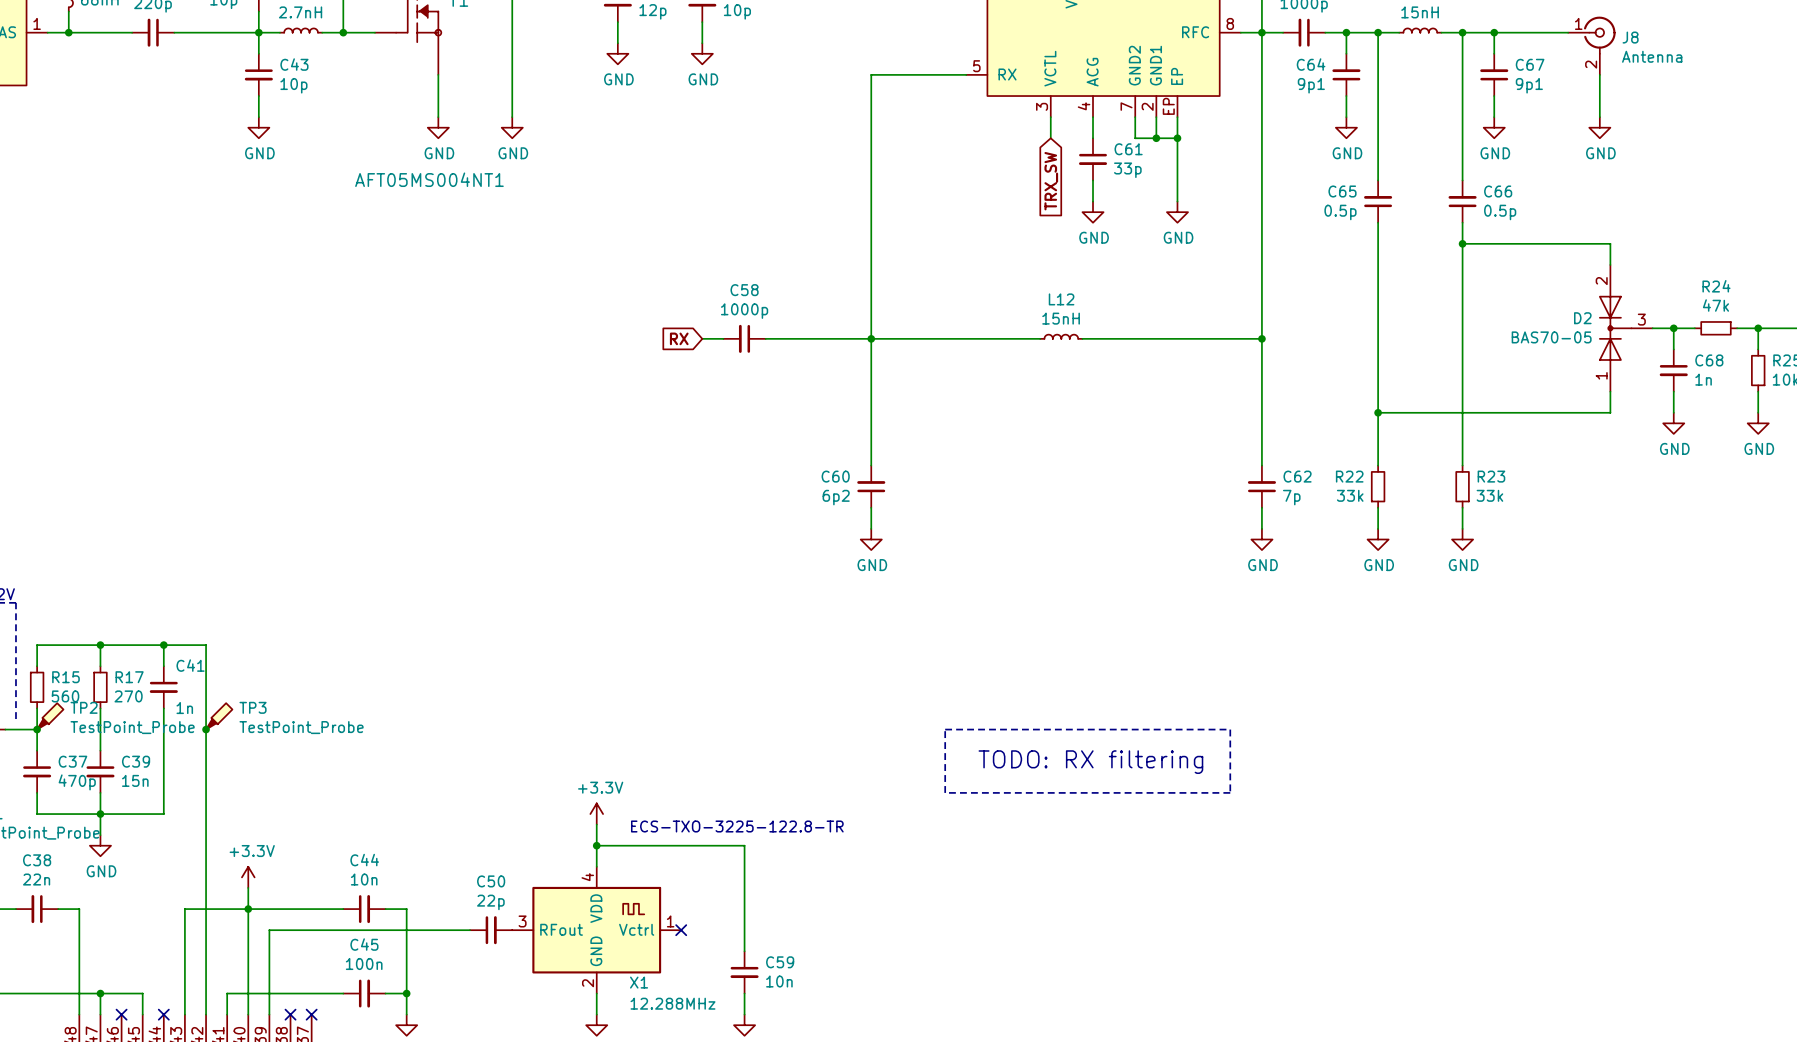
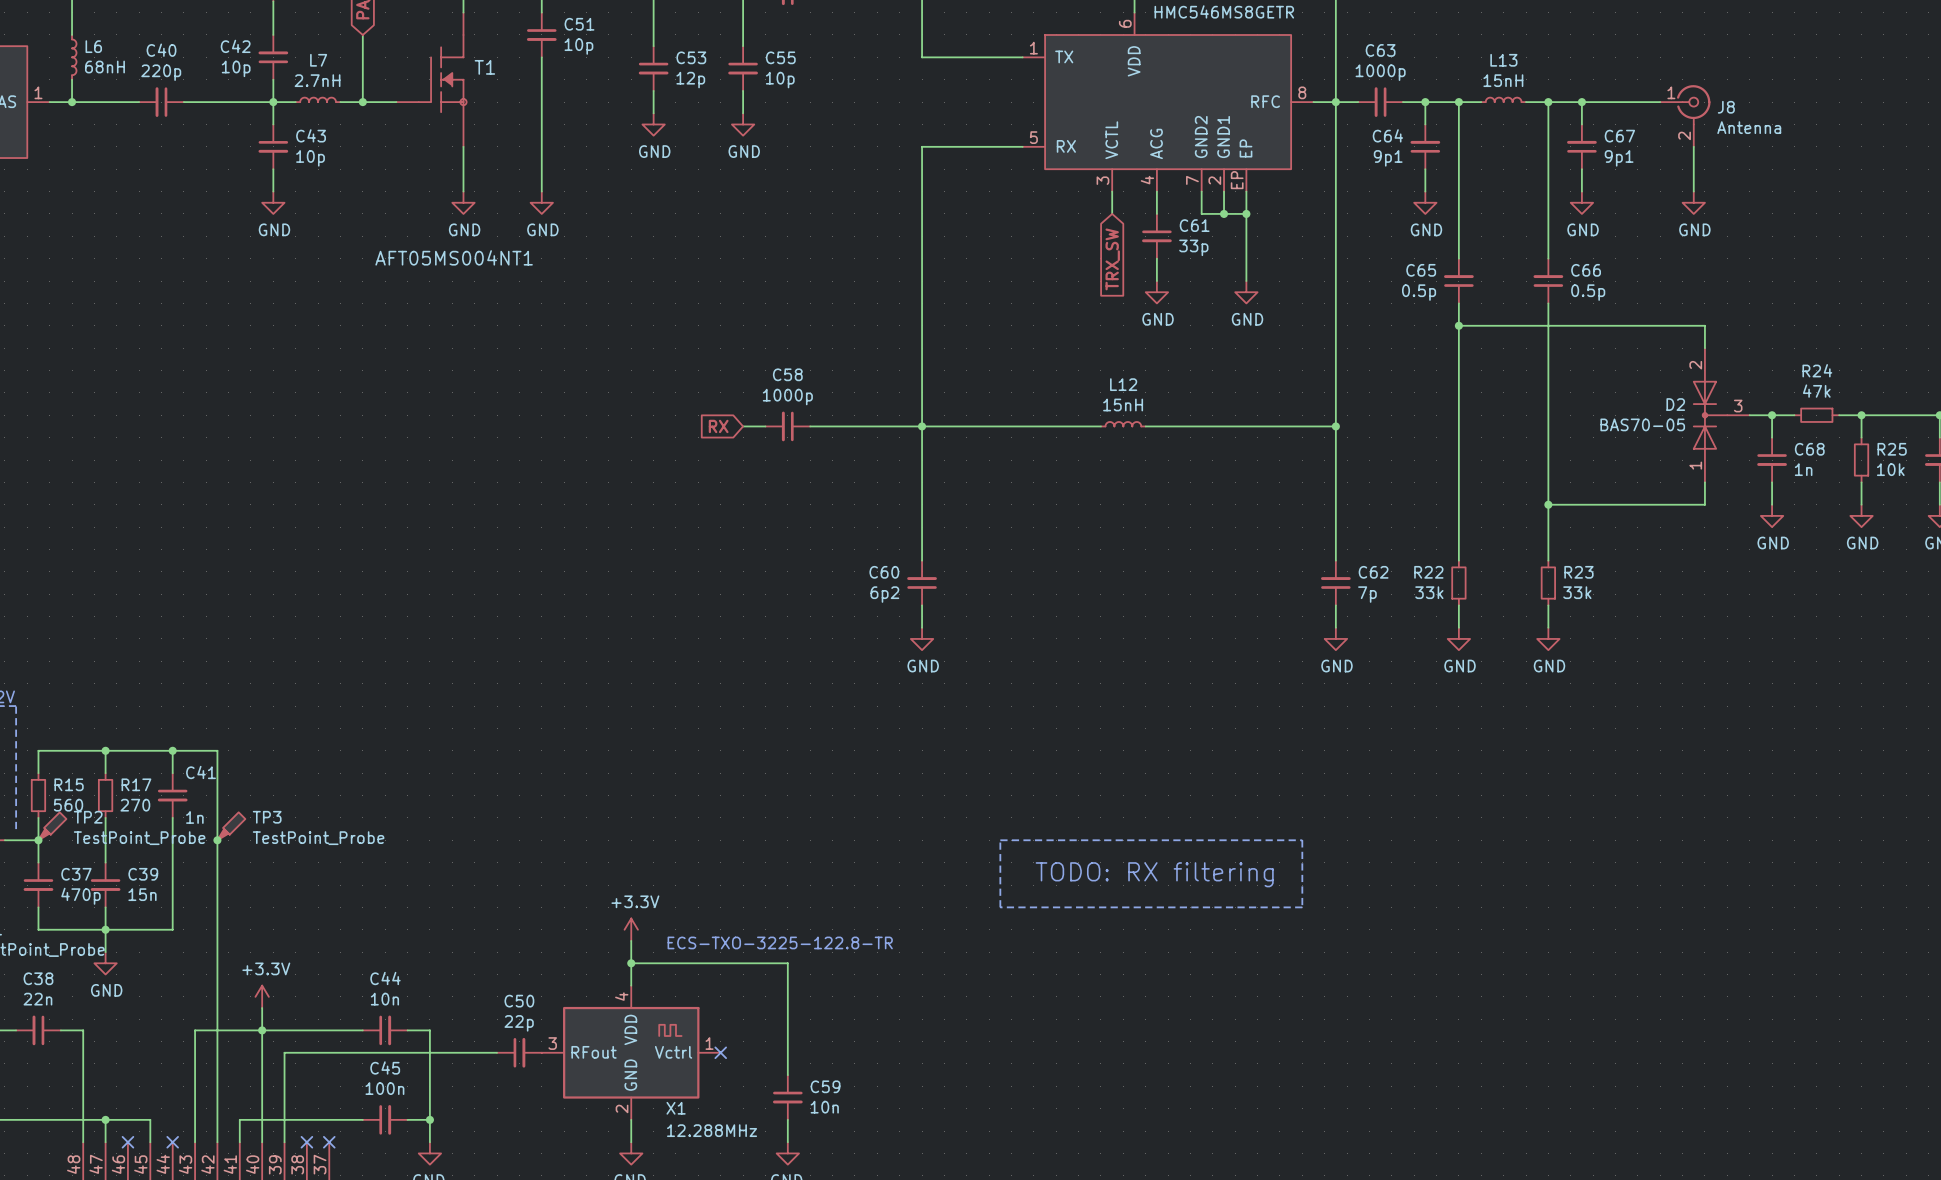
junction: none -> (1458, 325)
junction: (1462, 243) -> none
wire: (1378, 412) (1462, 412) -> (1458, 325) (1548, 325)
junction: (1378, 412) -> none
junction: none -> (1548, 504)

